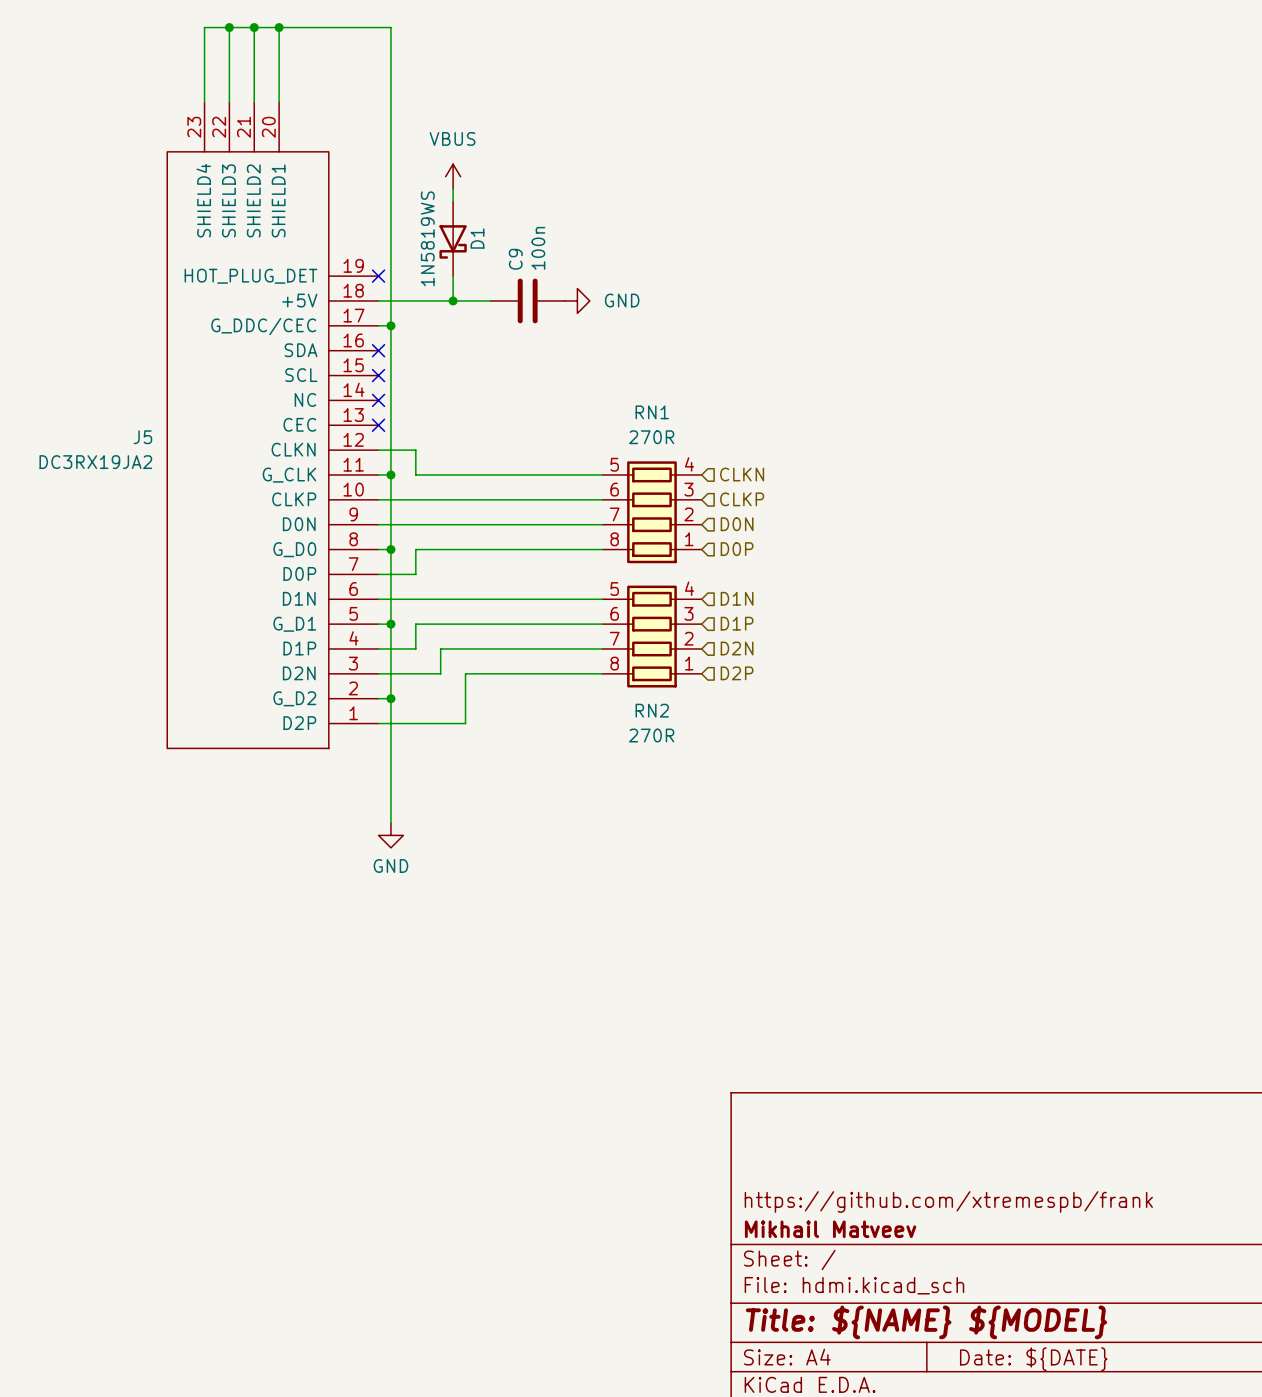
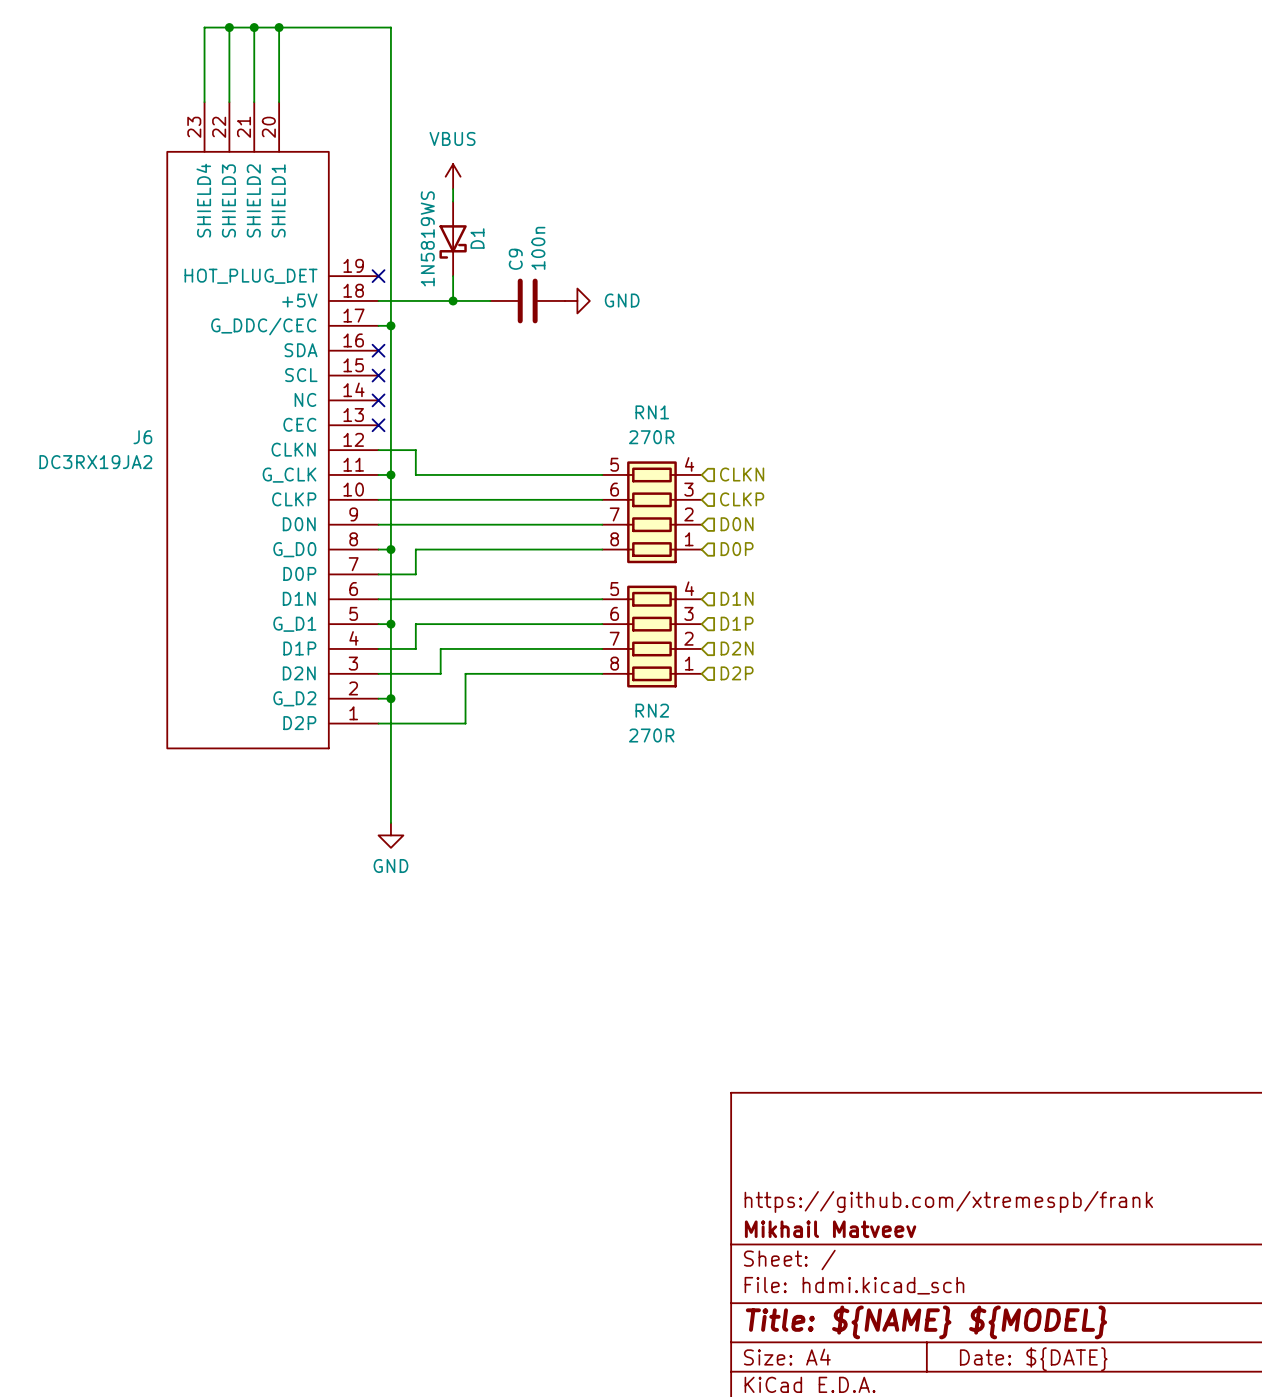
J5 name: J5 (142, 437) -> J6 (142, 437)

